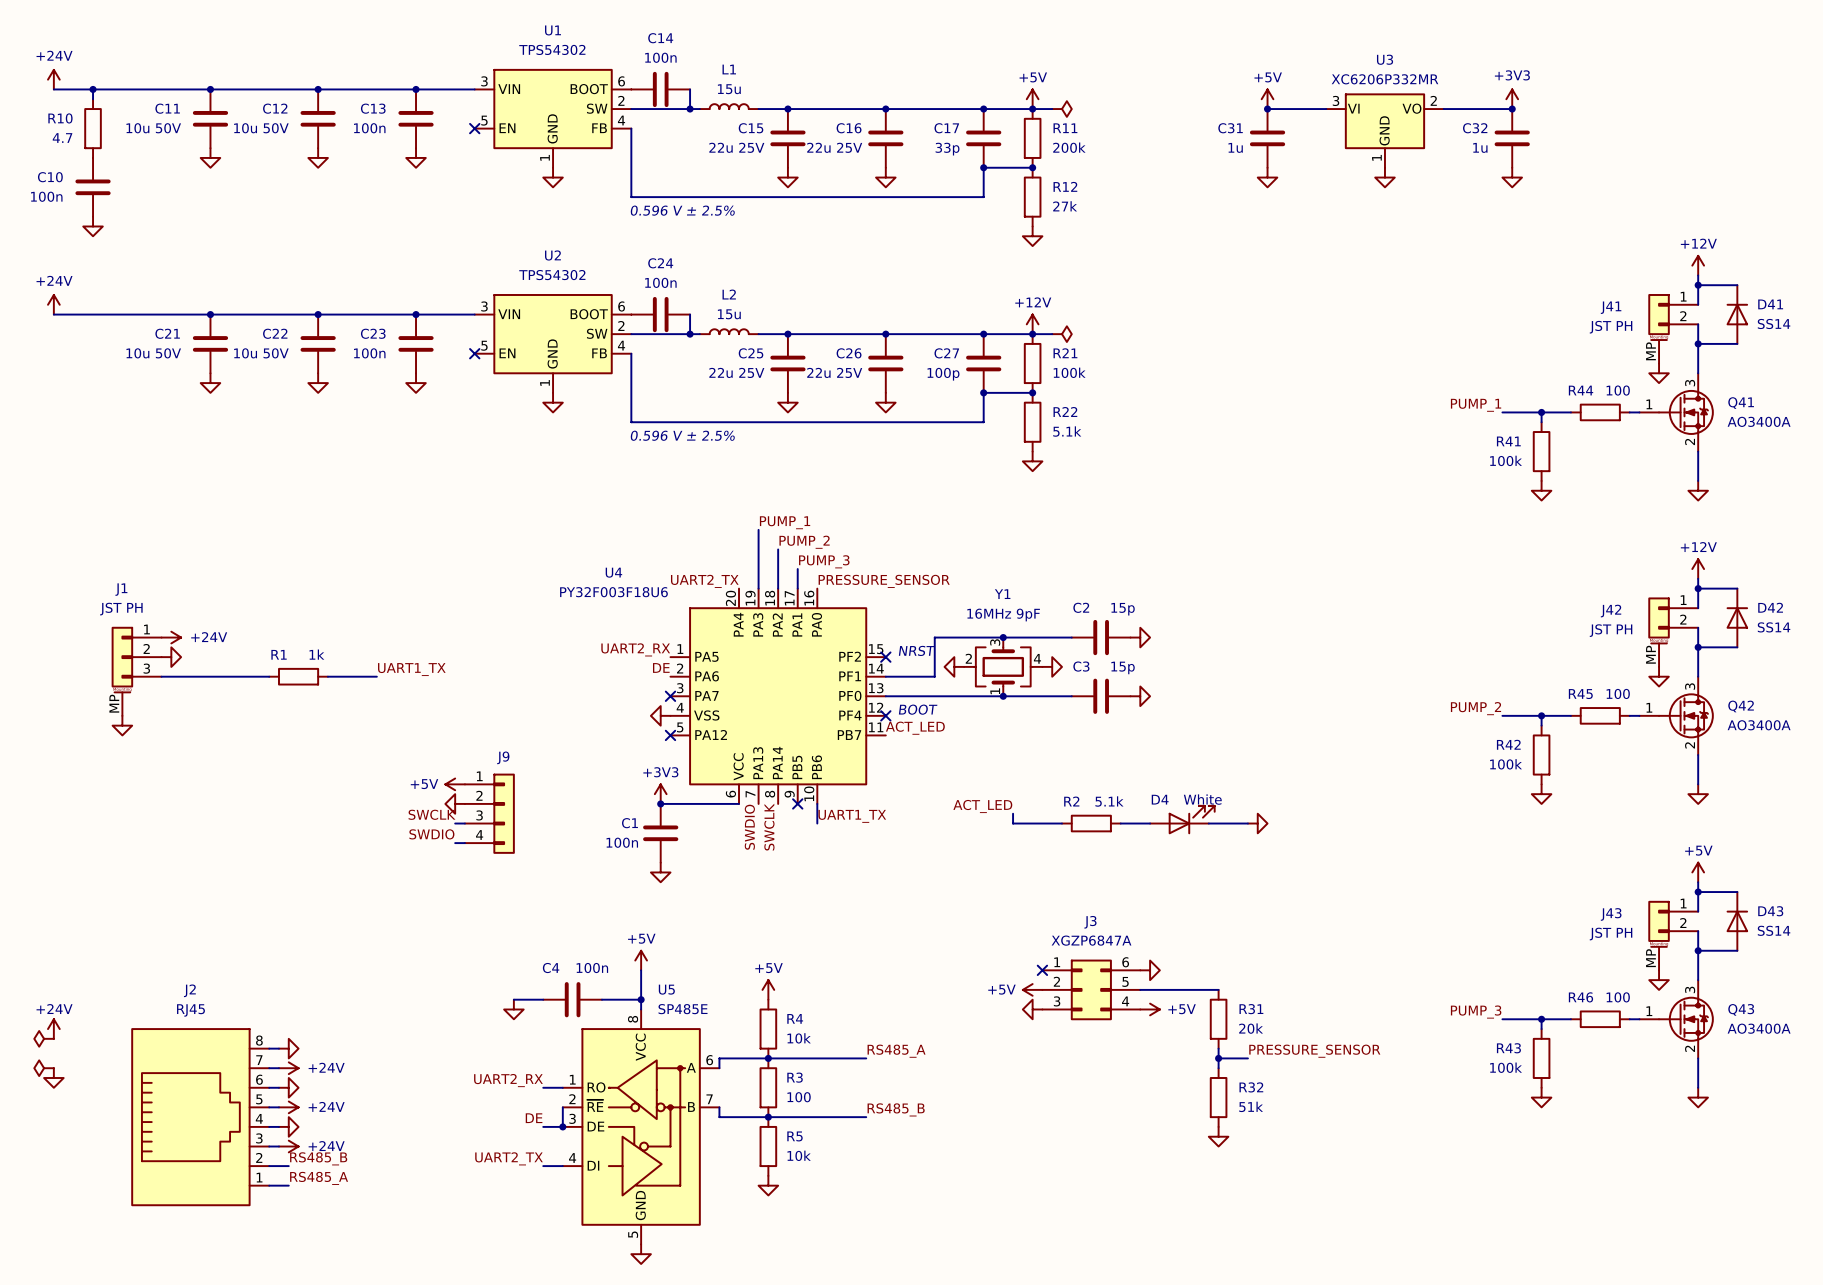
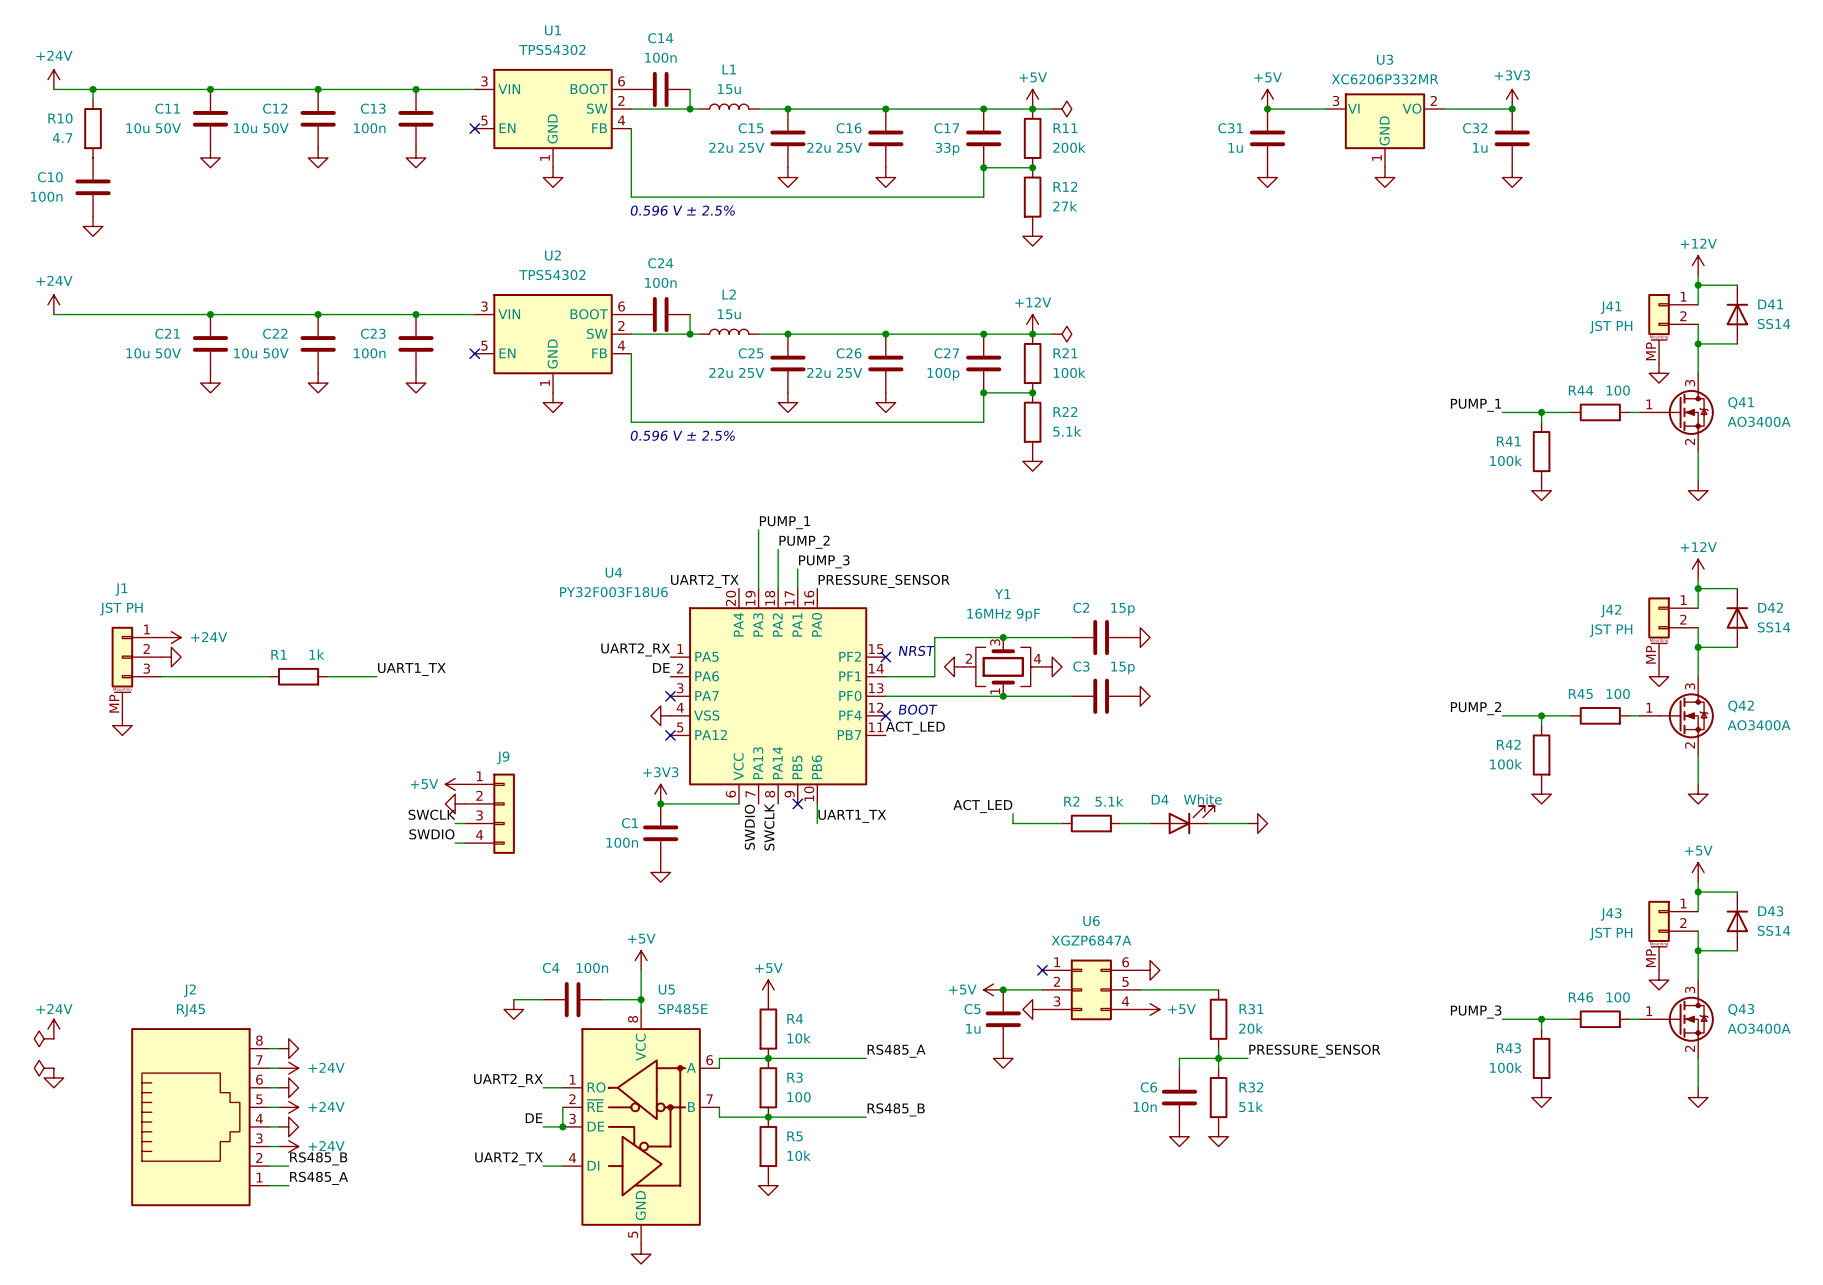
J3 name: J3 (1090, 922) -> U6 (1091, 921)
junction: none -> (1003, 989)
power symbol position: +5V (1032, 989) -> +5V (993, 989)
C5: none -> 1u (1003, 1019)
power symbol: none -> (1003, 1058)
wire: none -> (1218, 1058) (1179, 1058) (1179, 1068)
C6: none -> 10n (1179, 1097)
power symbol: none -> (1179, 1136)

